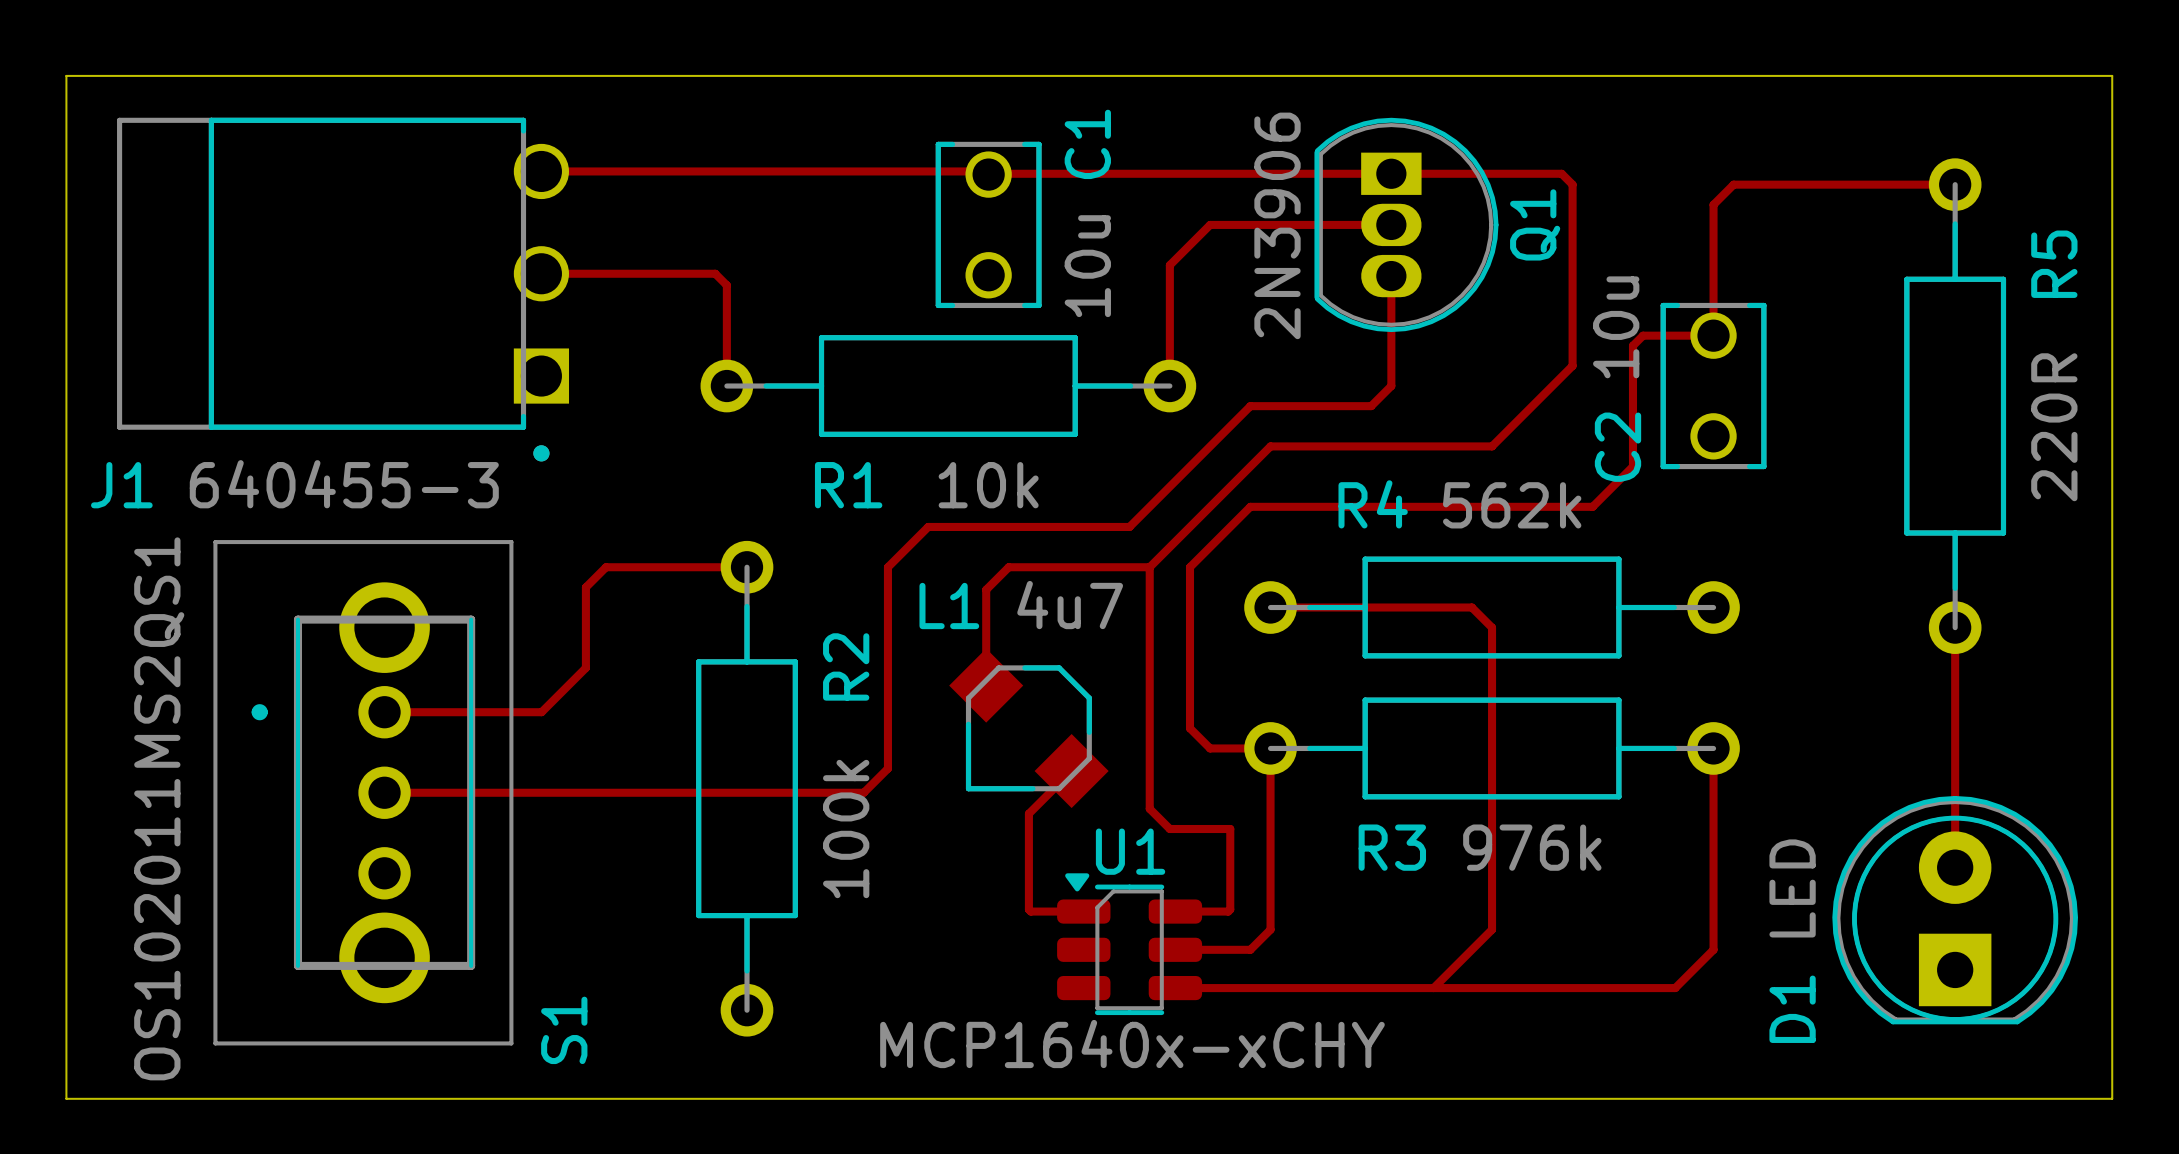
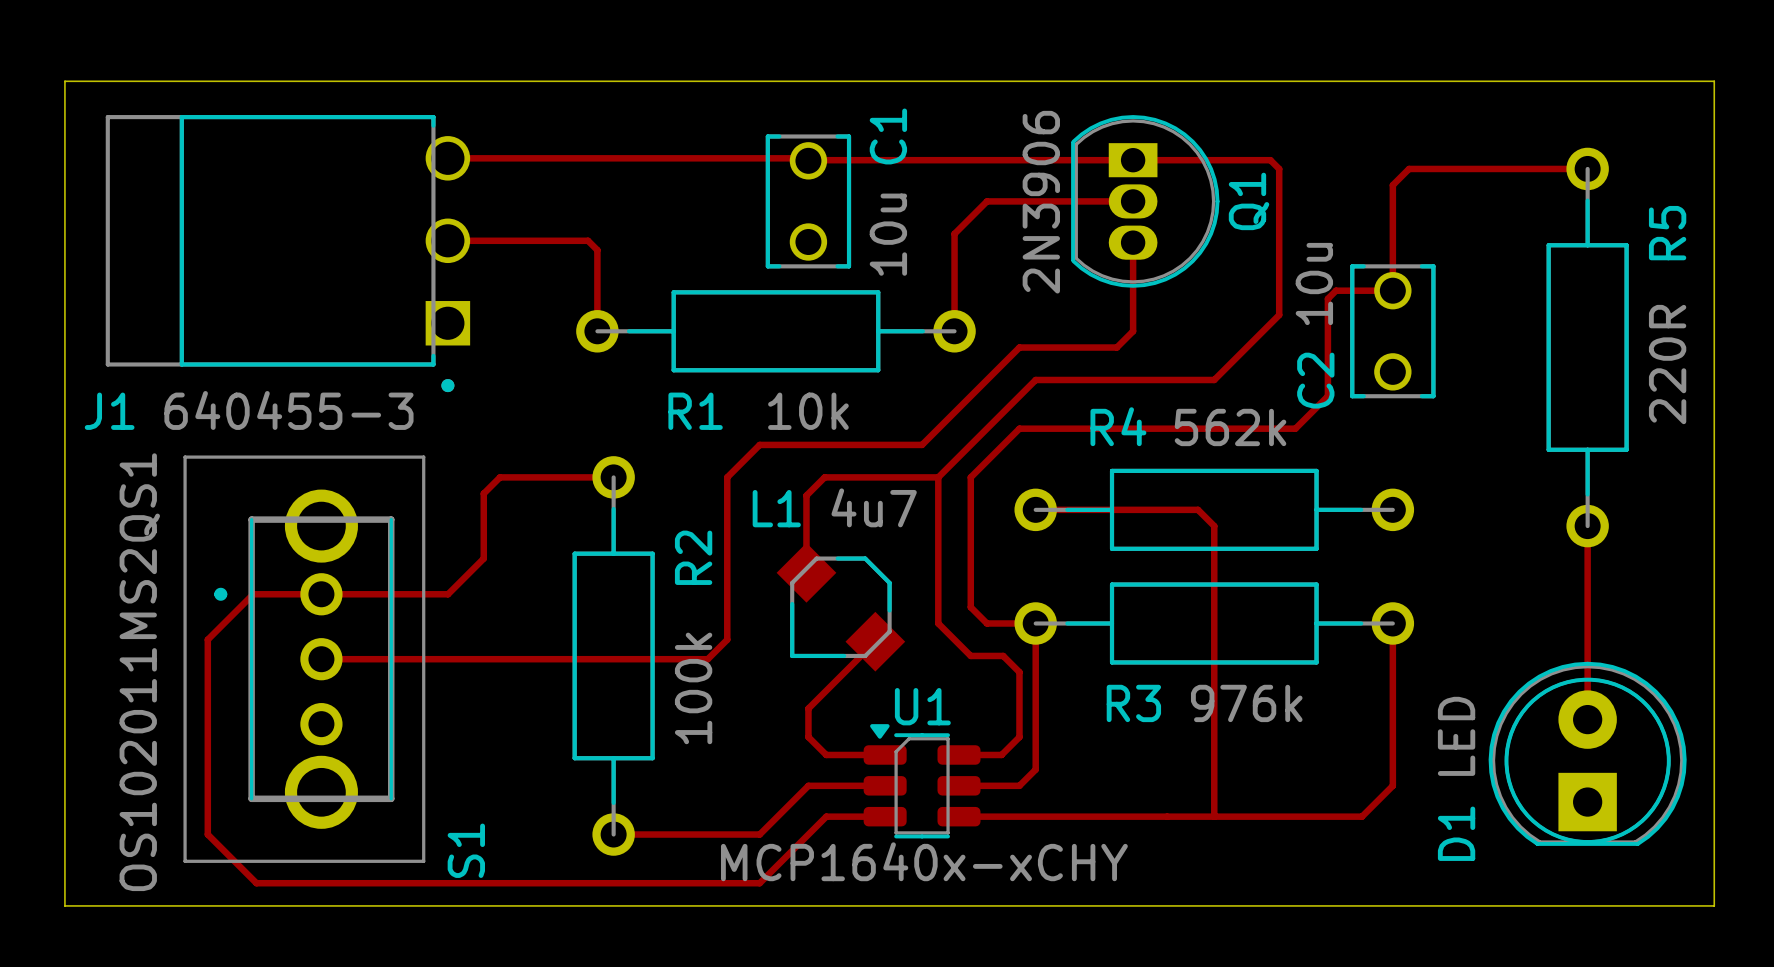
track: none -> (321, 594) (253, 594) (207, 639) (207, 834) (256, 883) (759, 883) (826, 816) (885, 816)
track: (1149, 748) (1149, 808) (1169, 829) (1230, 829) (1230, 909) -> (938, 623) (970, 655) (1003, 655) (1019, 672) (1019, 737) (1003, 753)
track: (1028, 813) (1028, 909) (1030, 911) -> (840, 676) (808, 708) (808, 737) (826, 754) (842, 754)
track: (1492, 929) (1433, 988) -> (1214, 769) (1214, 816)
track: none -> (885, 785) (808, 785) (759, 834) (613, 834)

